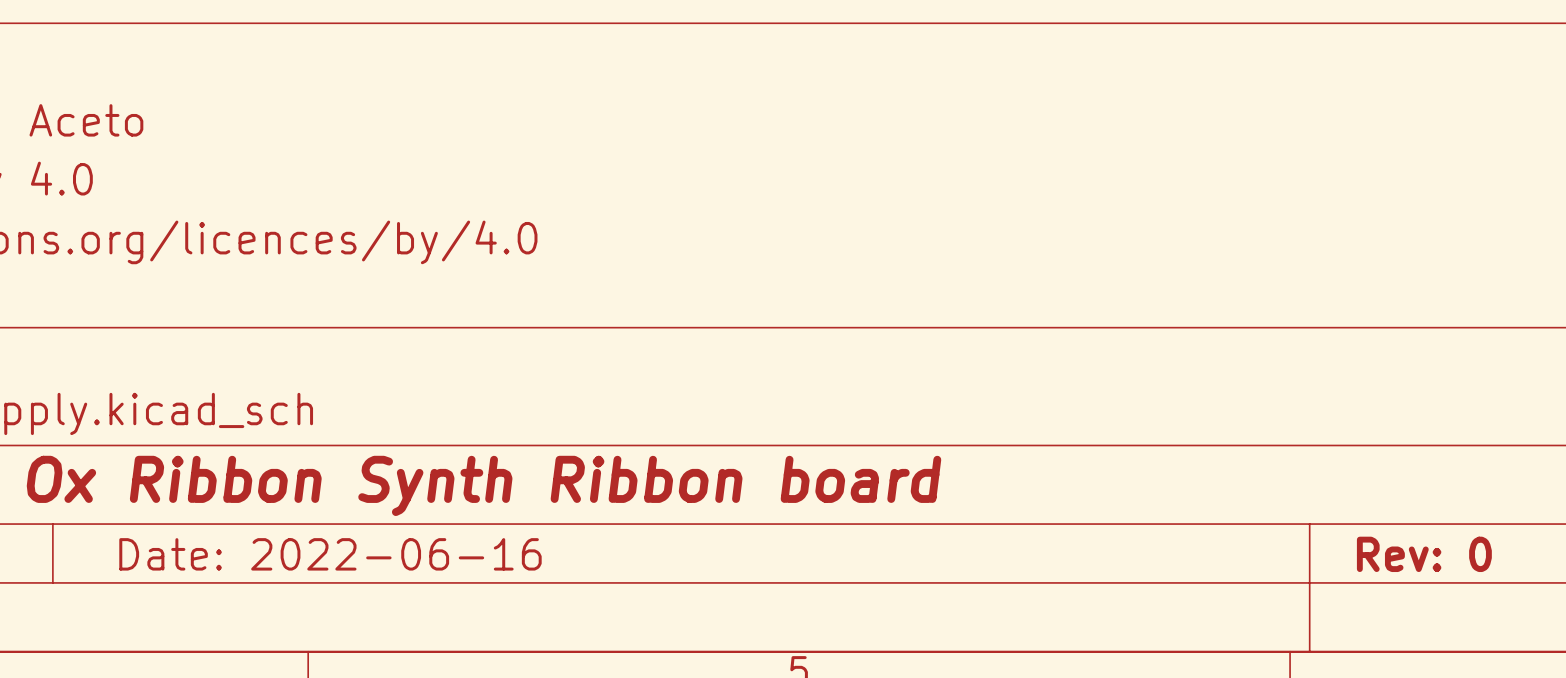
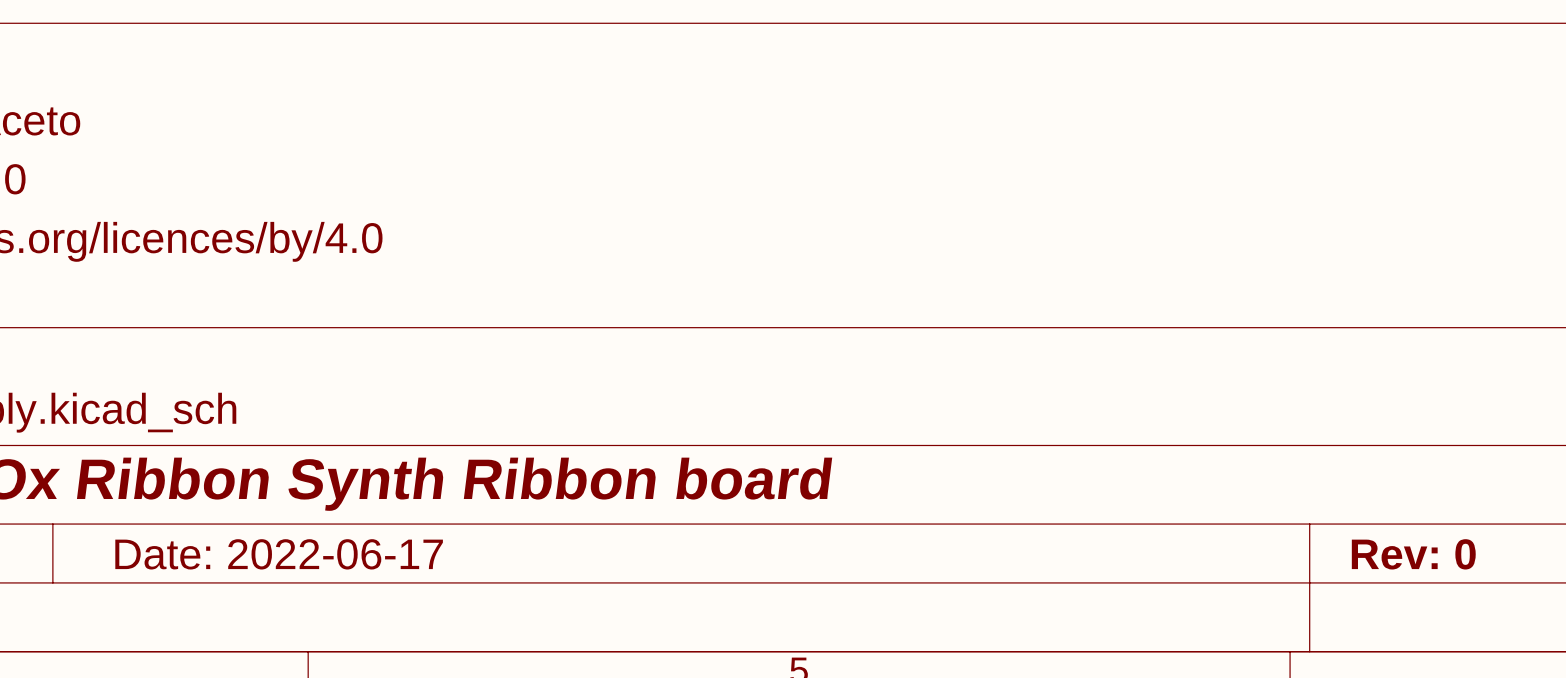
title block: Date: 2022-06-16 (330, 554) -> Date: 2022-06-17 (279, 554)

